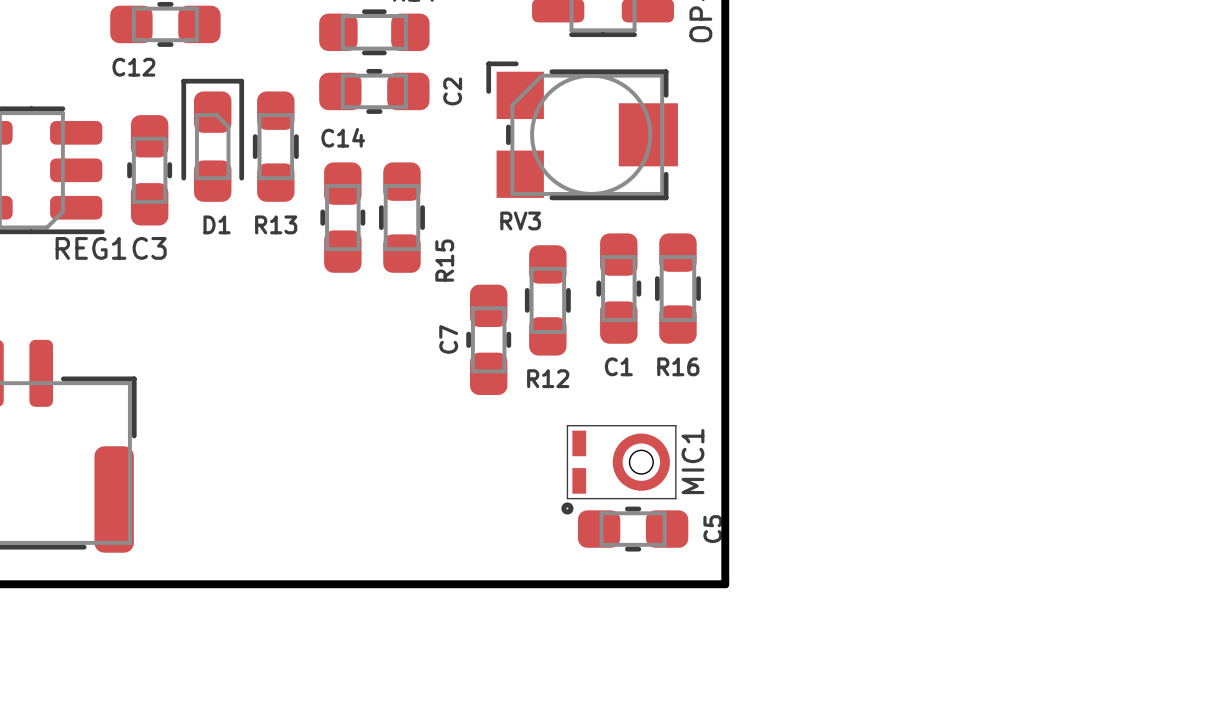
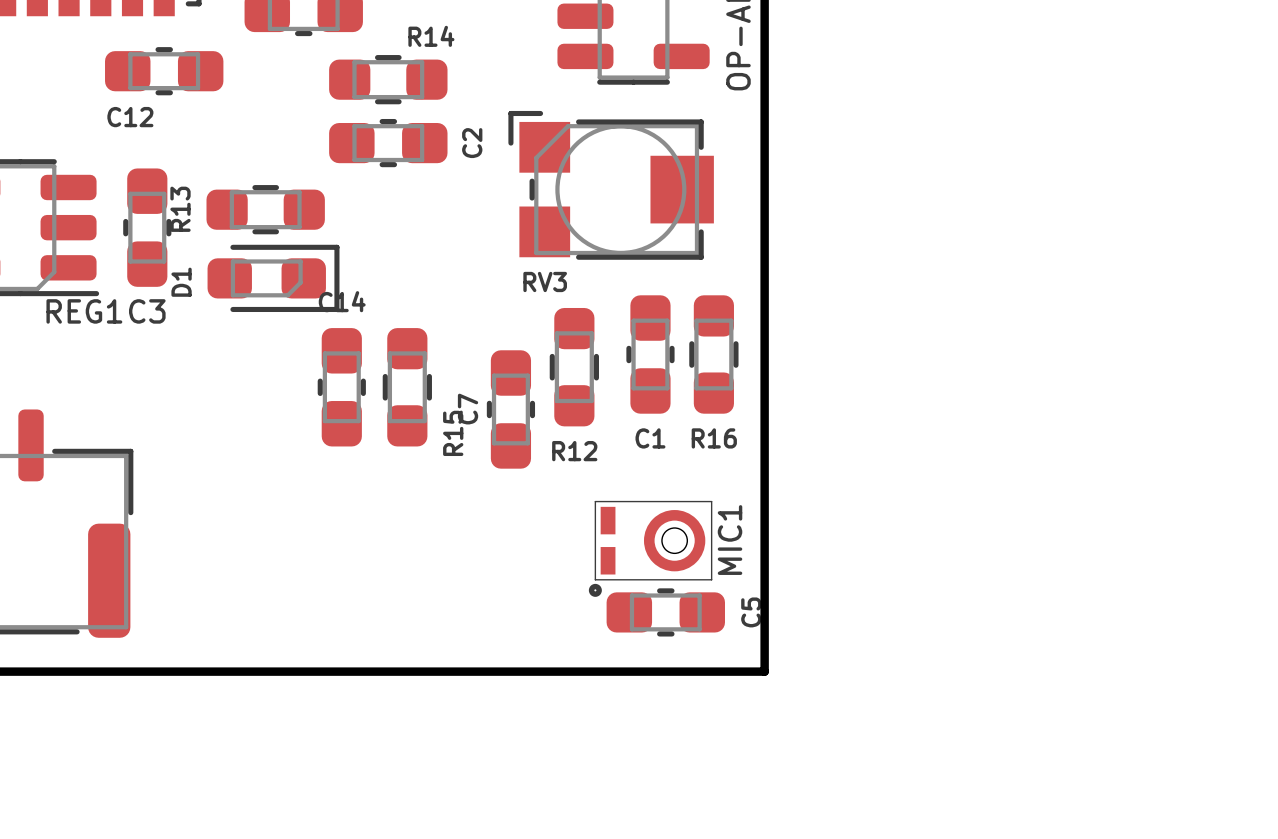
D1 rotation: 0° (212, 140) -> 90° clockwise (273, 278)
D1 position: (212, 140) -> (273, 278)
R13 rotation: 0° (275, 146) -> 90° clockwise (265, 209)
C14 position: (342, 217) -> (341, 387)
R15 position: (401, 217) -> (407, 387)

